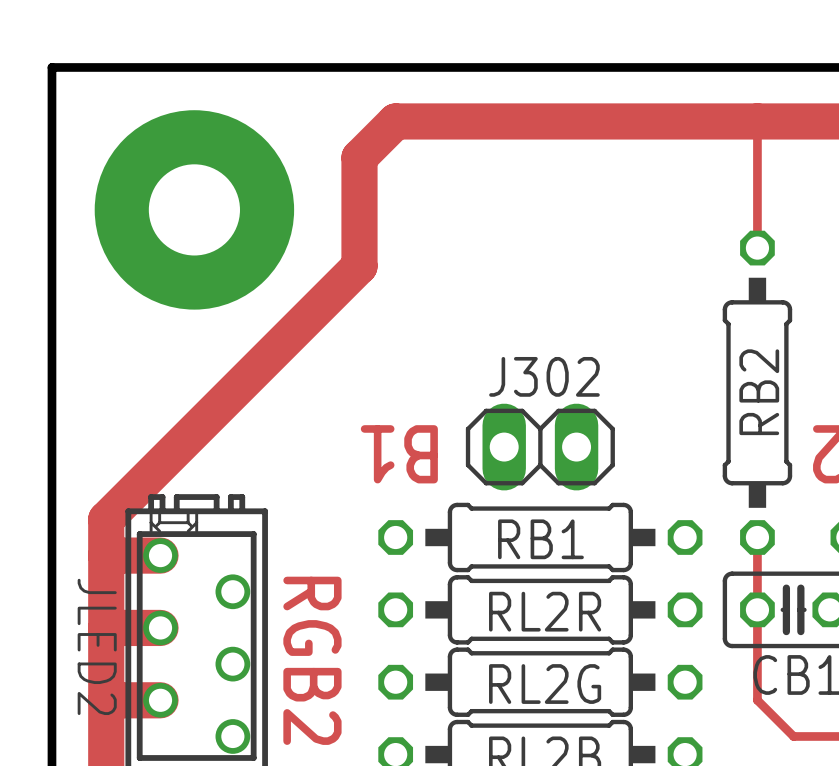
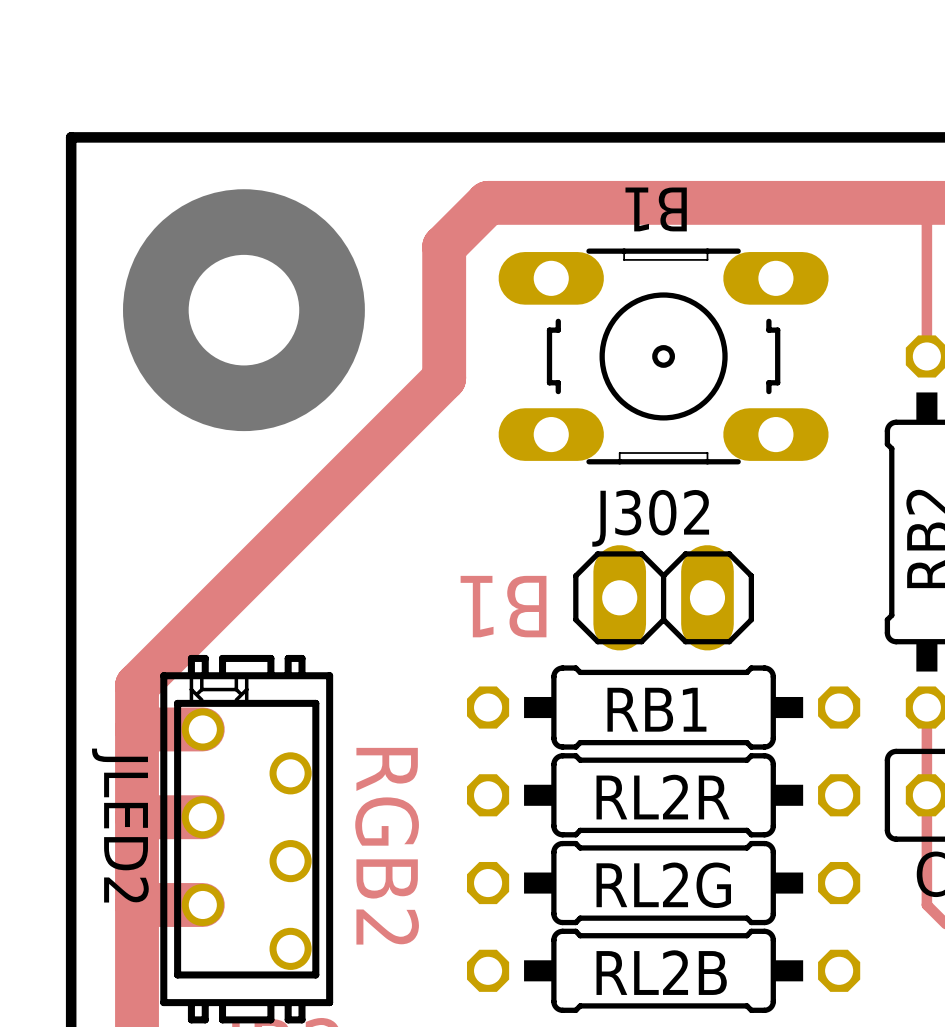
B1: none -> (663, 356)

